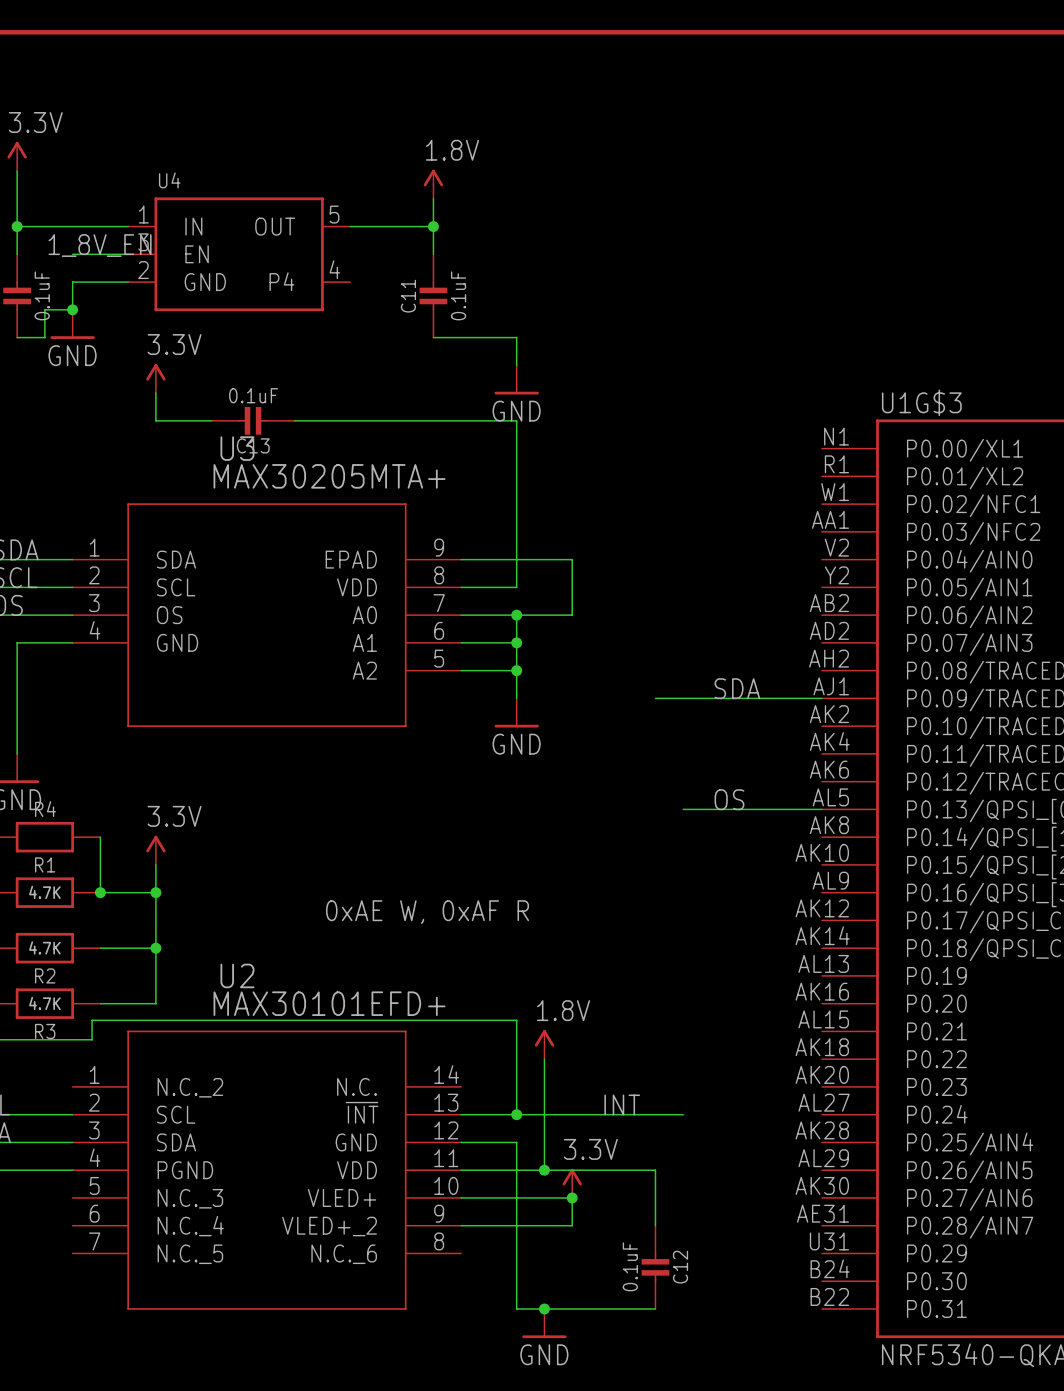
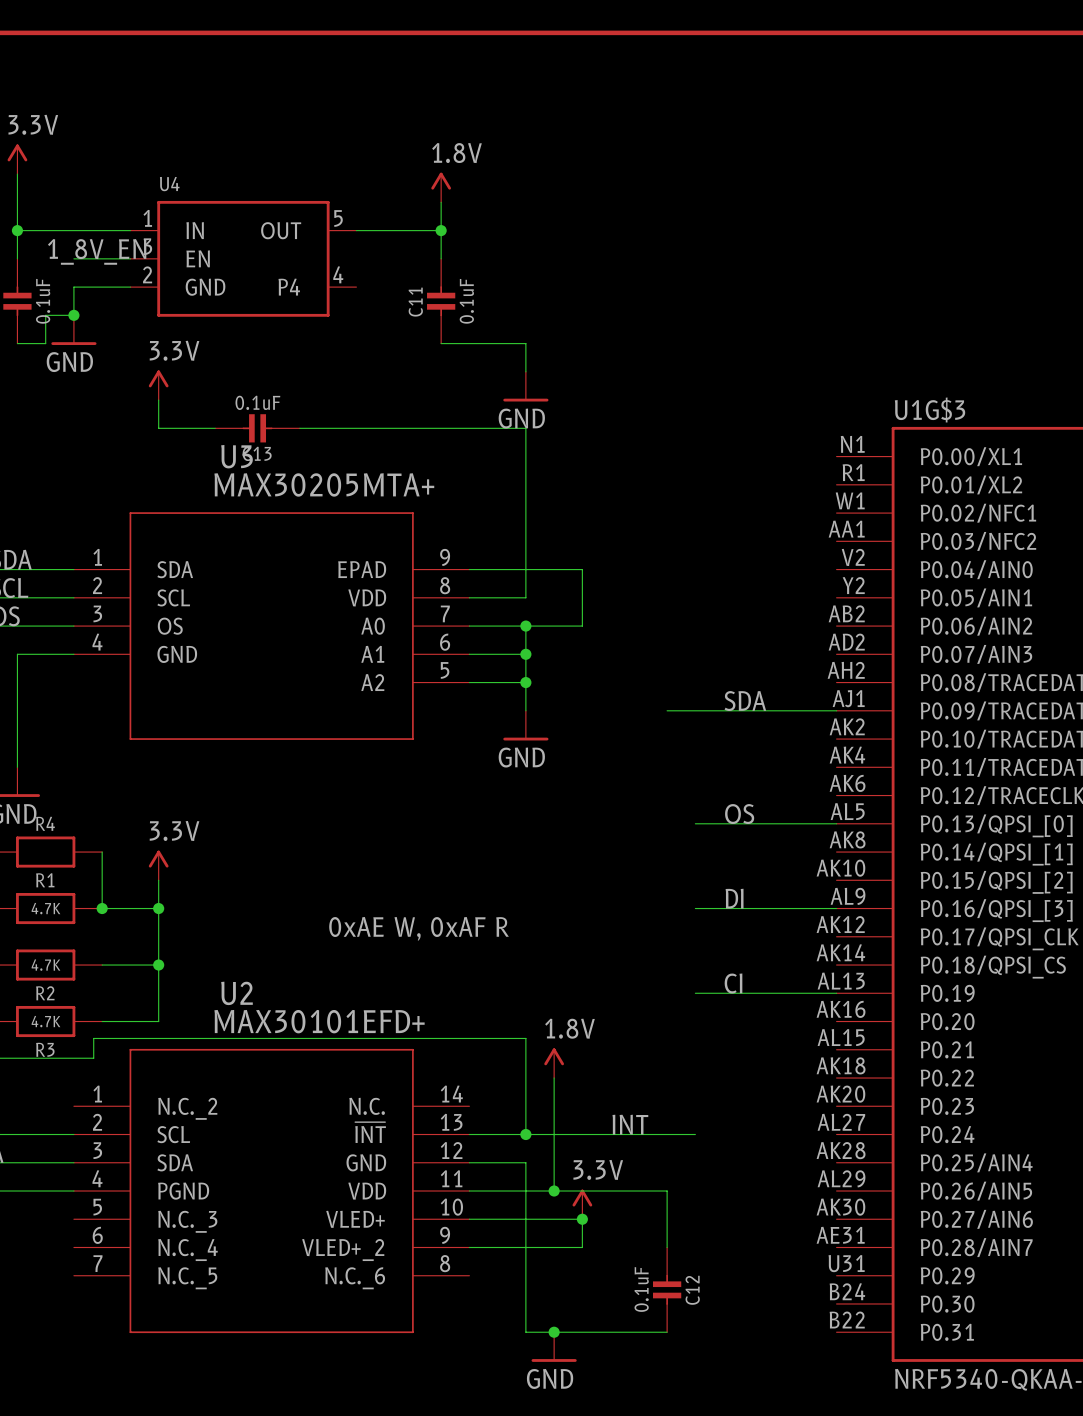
label: none -> DI (734, 898)
wire: none -> (695, 908) (836, 908)
label: none -> CI (733, 983)
wire: none -> (695, 993) (836, 993)

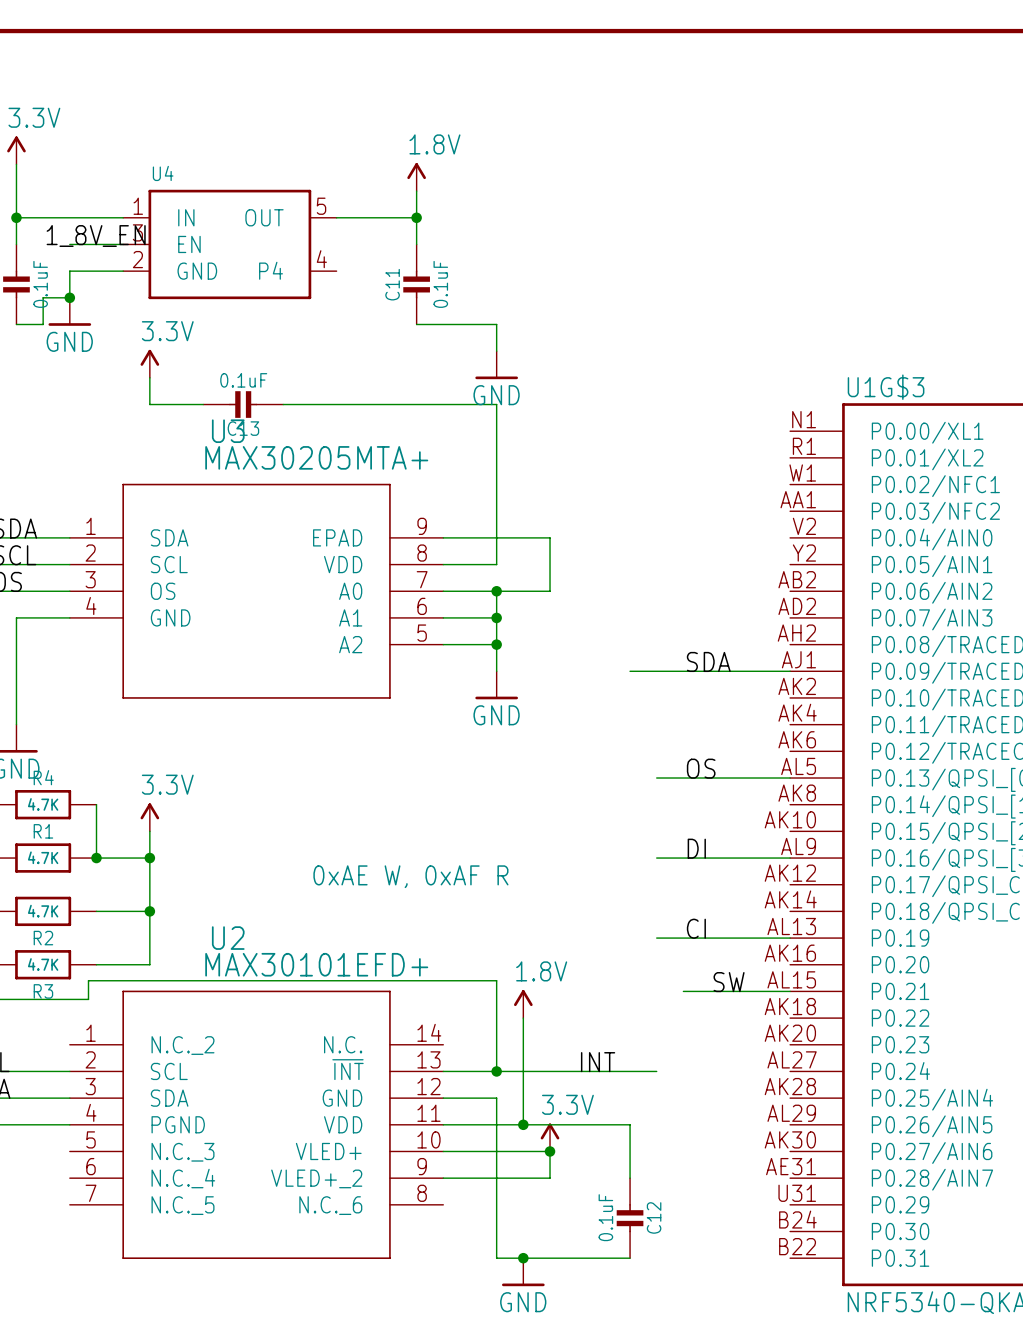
R4 value: none -> 4.7K (43, 804)
label: none -> SW (729, 982)
wire: none -> (683, 991) (790, 991)

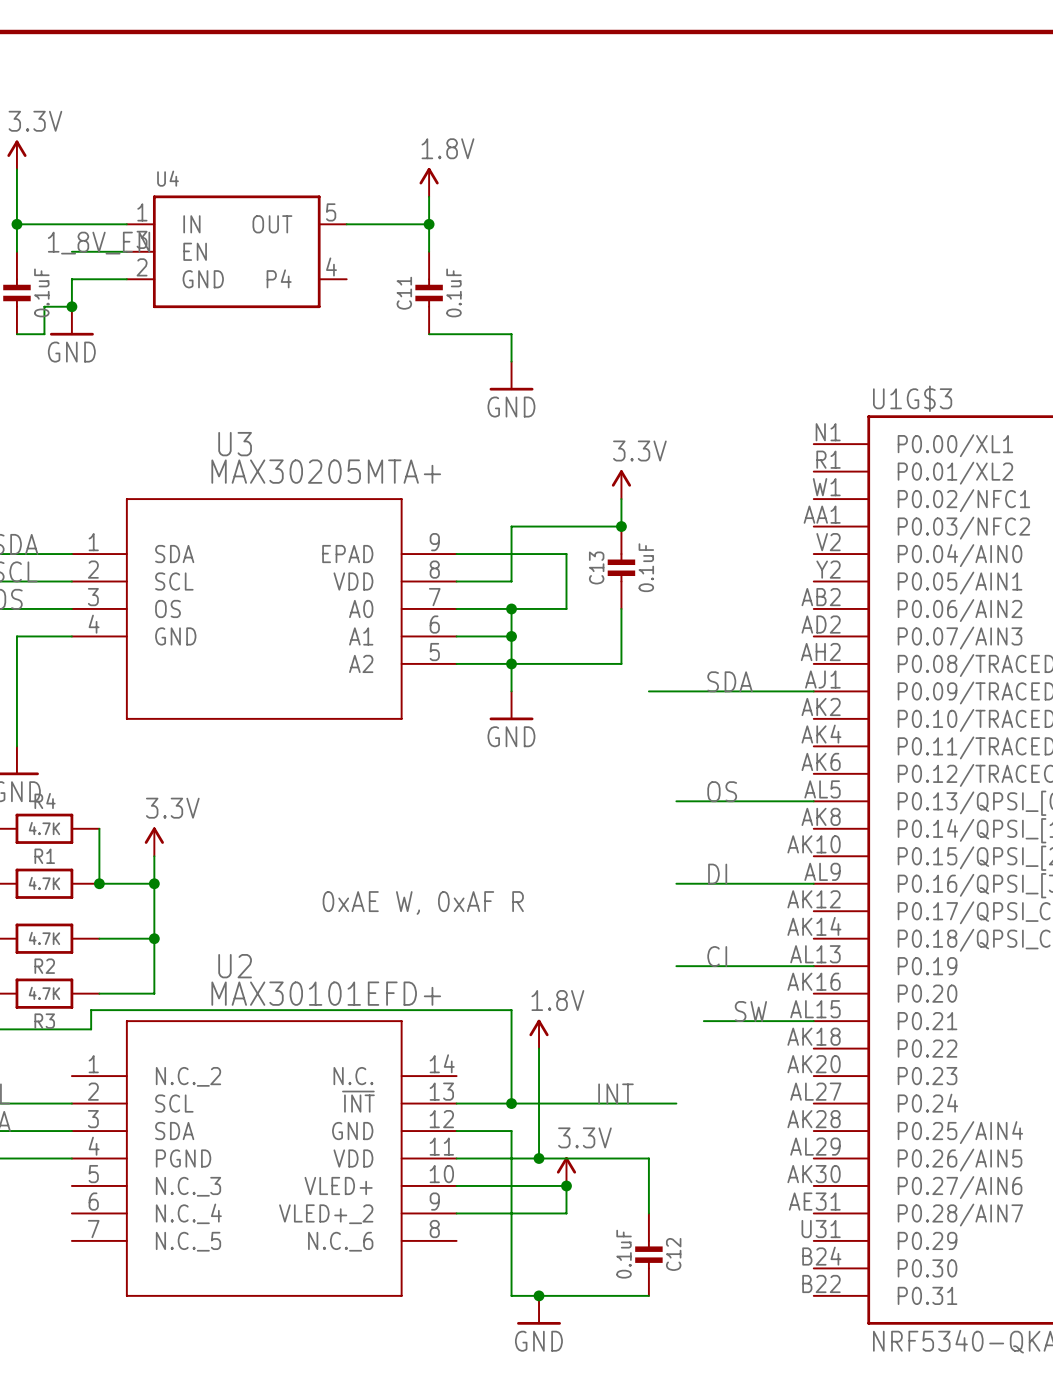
power symbol: 3.3V (149, 363) -> none
wire: (149, 377) (149, 404) (203, 404) -> none
C13 rotation: 0° (243, 404) -> 90° clockwise (621, 567)
C13 position: (243, 404) -> (621, 567)
wire: (283, 404) (496, 404) (496, 511) -> (621, 499) (621, 526) (511, 526)
power symbol: none -> 3.3V (621, 484)
junction: none -> (621, 526)
wire: none -> (621, 608) (621, 663) (511, 663)

